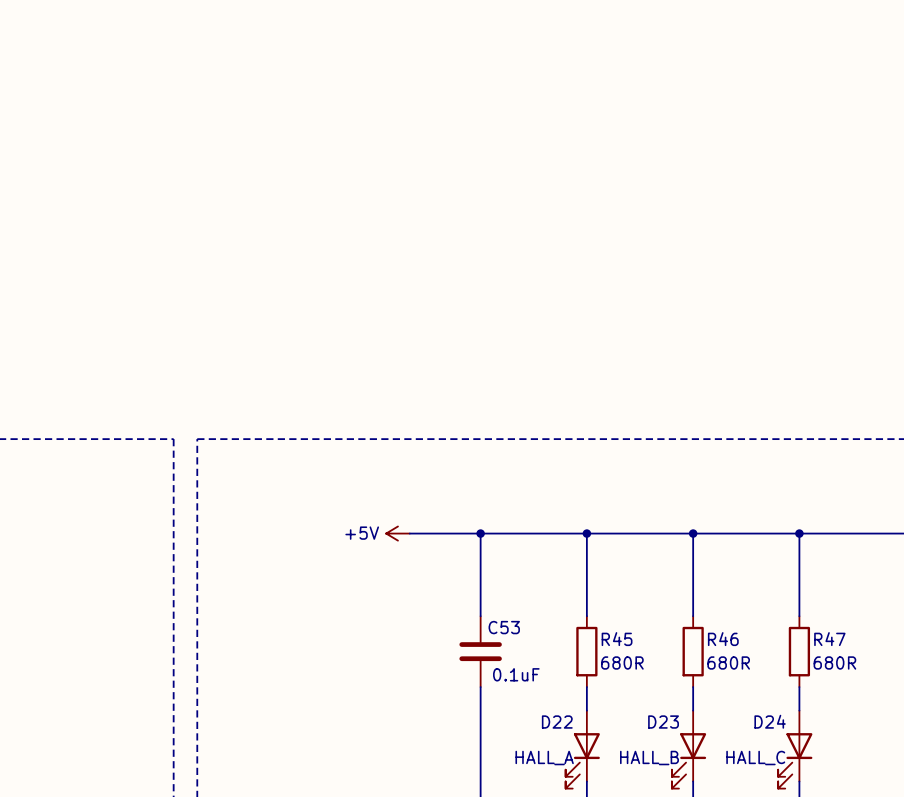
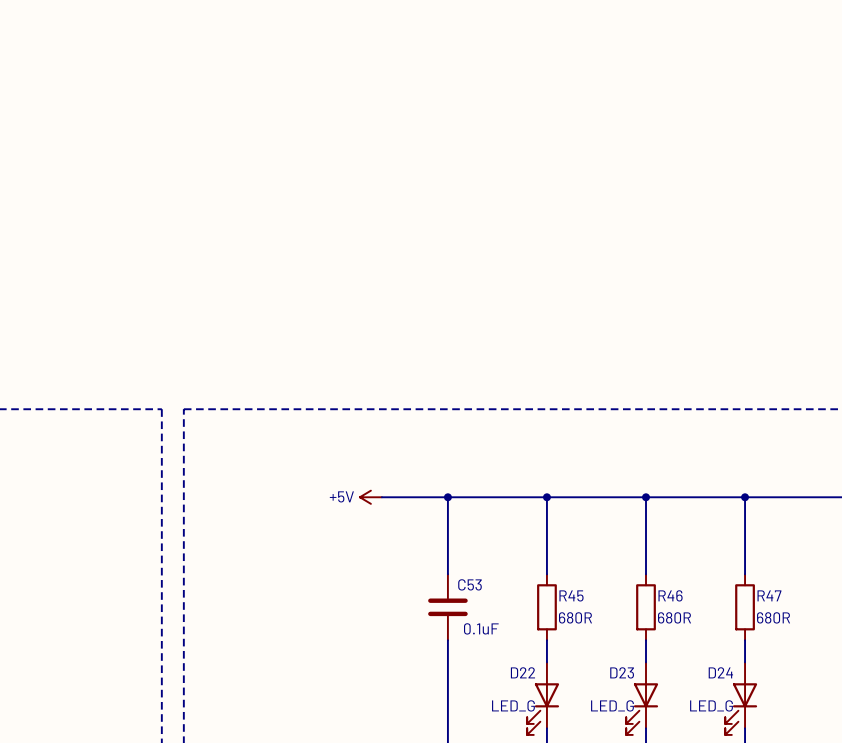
D22 value: HALL_A (544, 758) -> LED_G (513, 705)
D23 value: HALL_B (649, 758) -> LED_G (612, 705)
D24 value: HALL_C (755, 758) -> LED_G (711, 705)

